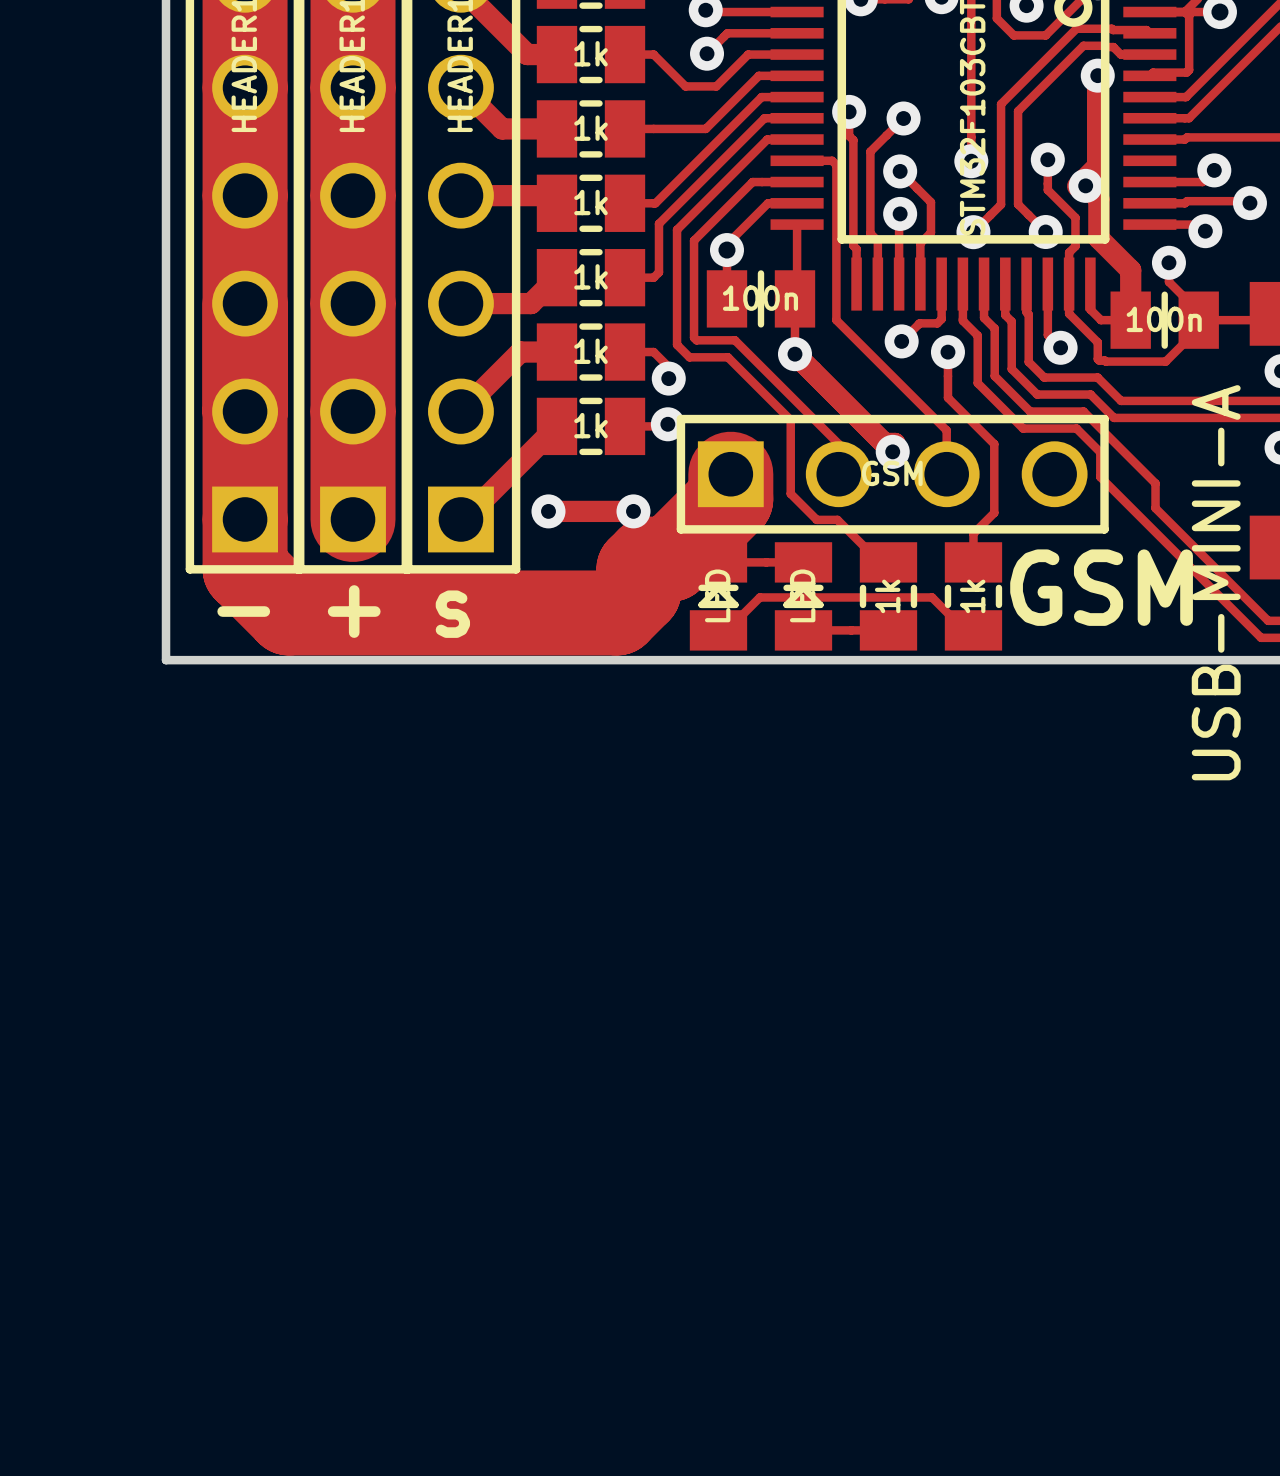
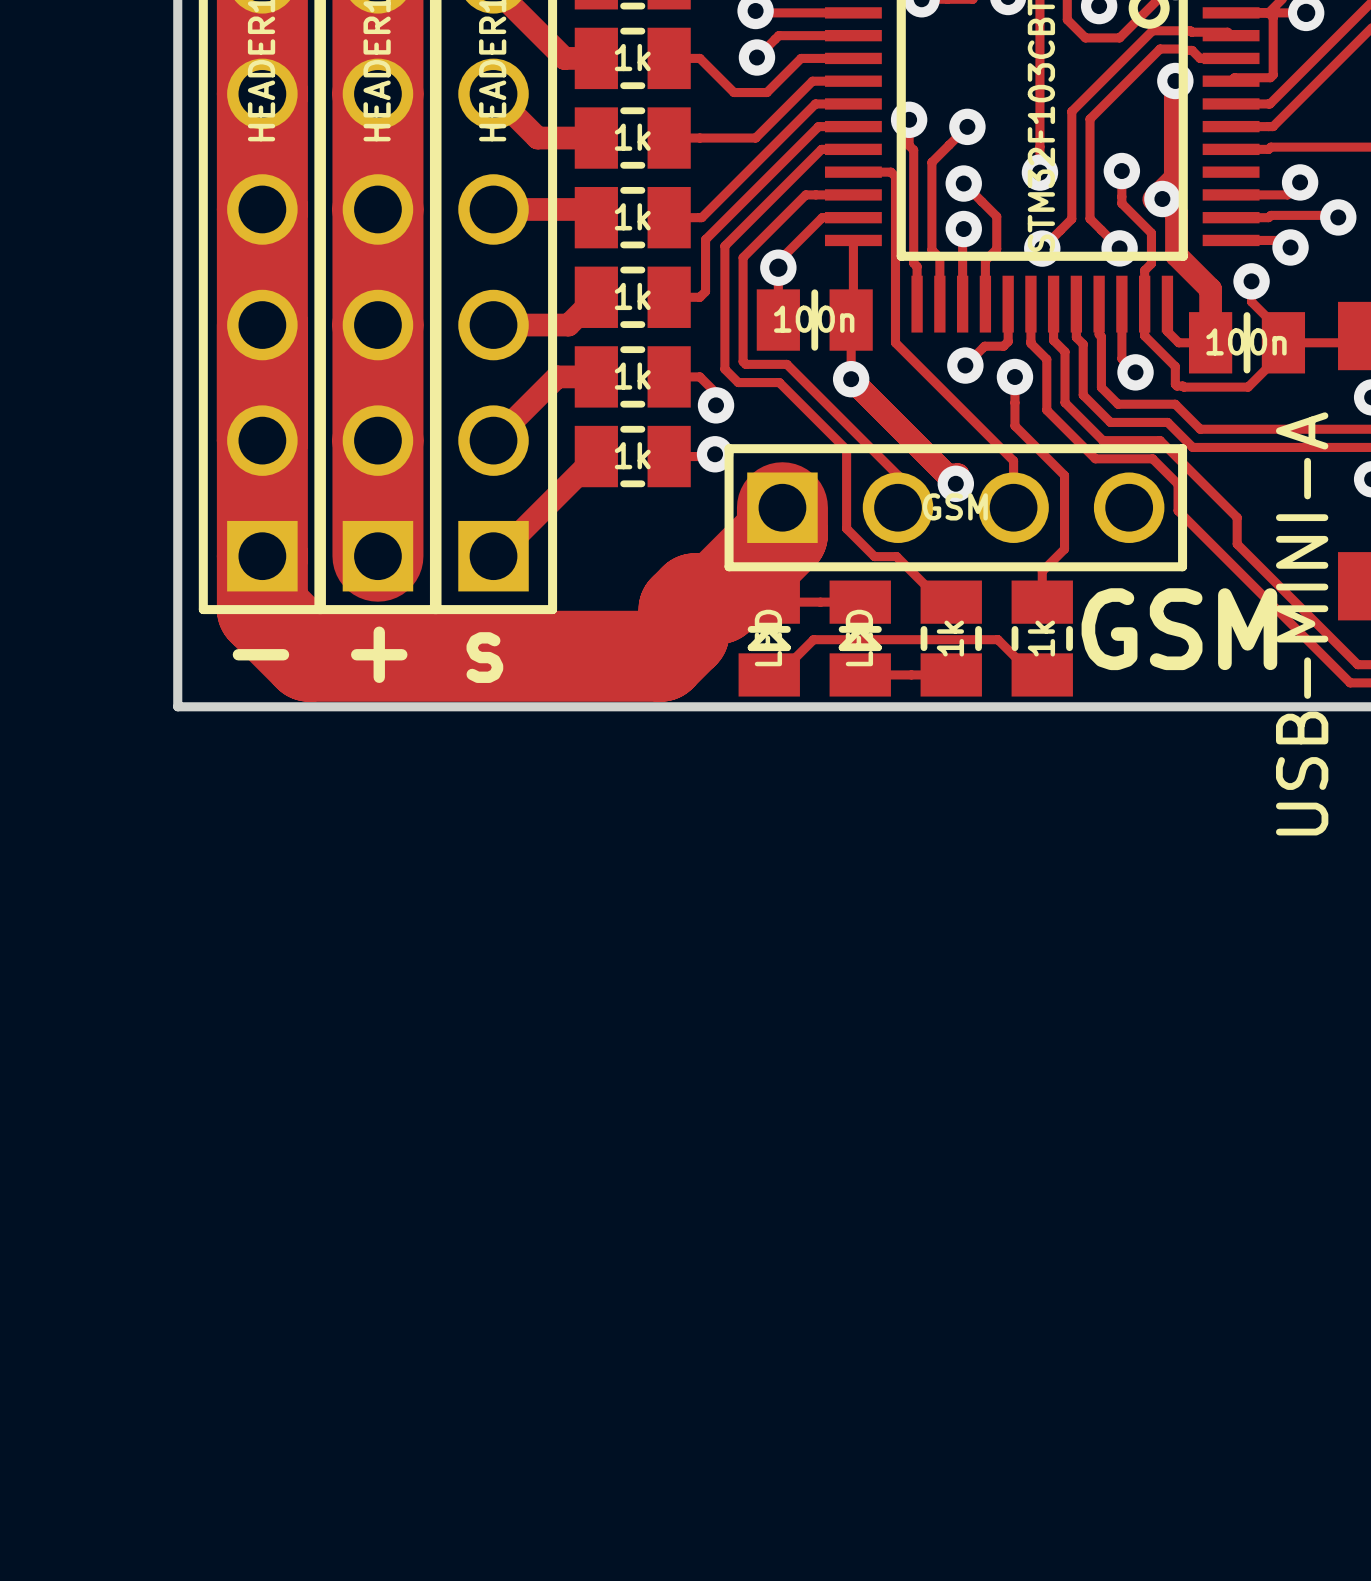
track: (548, 511) (633, 511) -> none
via: (548, 511) -> none
via: (633, 511) -> none

